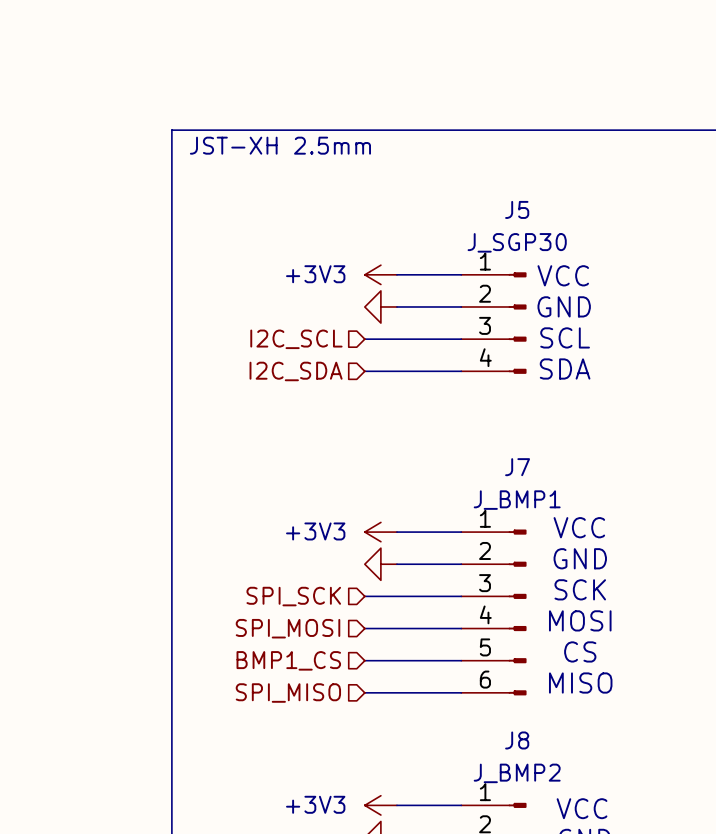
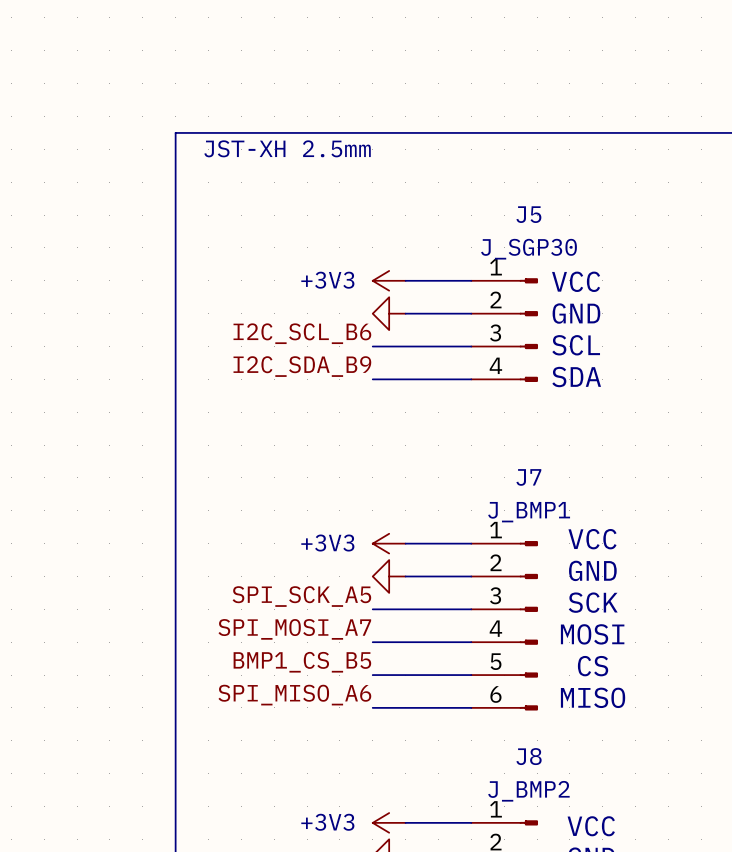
label: none -> I2C_SCL_B6 (302, 333)
hierarchical label: I2C_SCL (296, 339) -> none
label: none -> I2C_SDA_B9 (302, 366)
hierarchical label: I2C_SDA (296, 371) -> none
label: none -> SPI_SCK_A5 (301, 596)
hierarchical label: SPI_SCK (293, 596) -> none
label: none -> SPI_MOSI_A7 (294, 629)
hierarchical label: SPI_MOSI (288, 628) -> none
label: none -> BMP1_CS_B5 (302, 662)
hierarchical label: BMP1_CS (288, 660) -> none
label: none -> SPI_MISO_A6 (294, 695)
hierarchical label: SPI_MISO (288, 693) -> none

